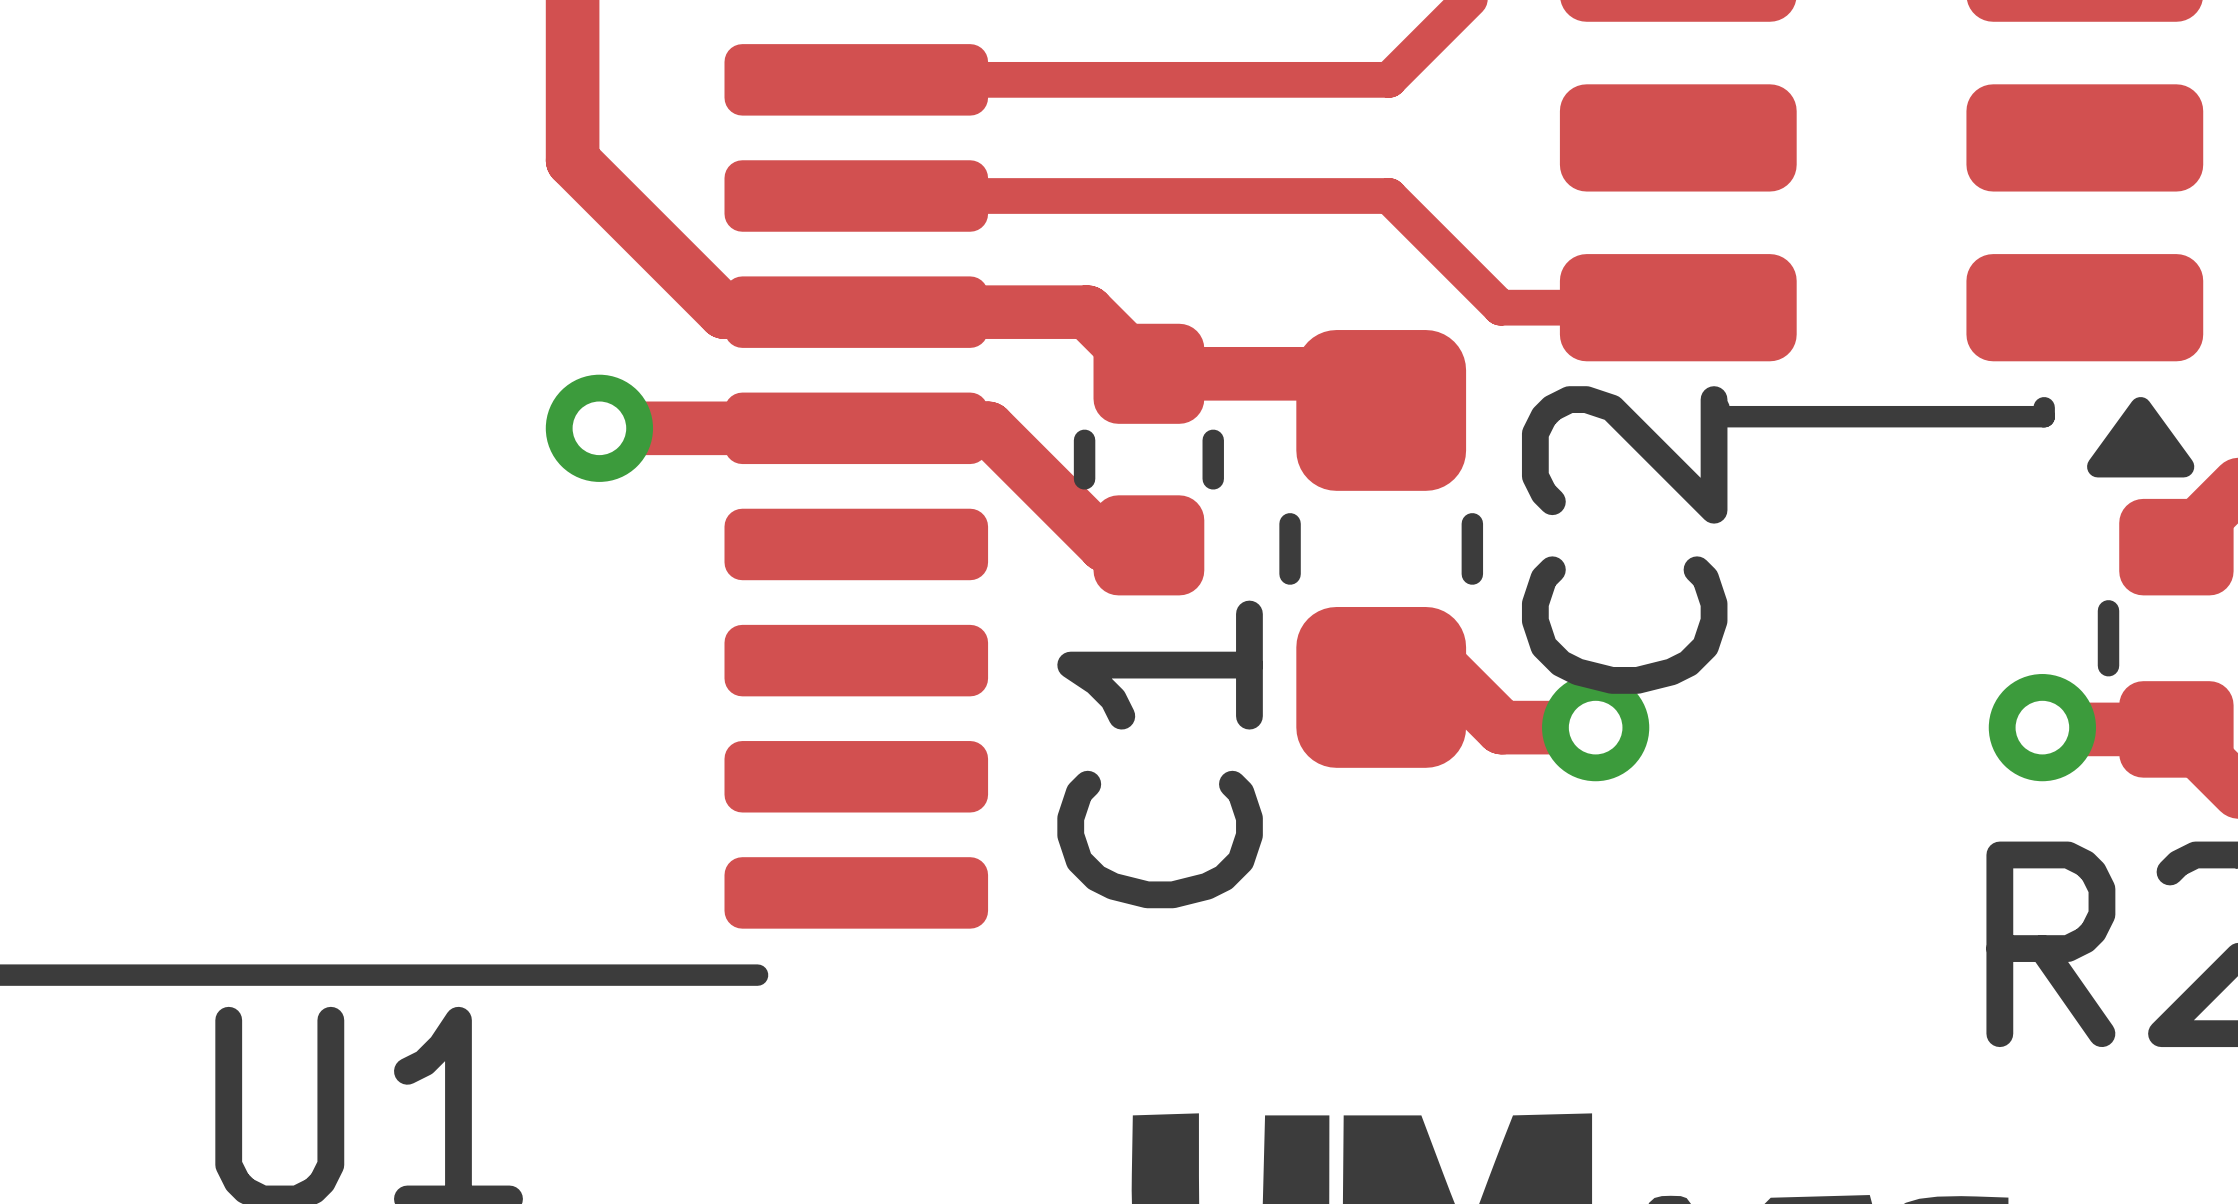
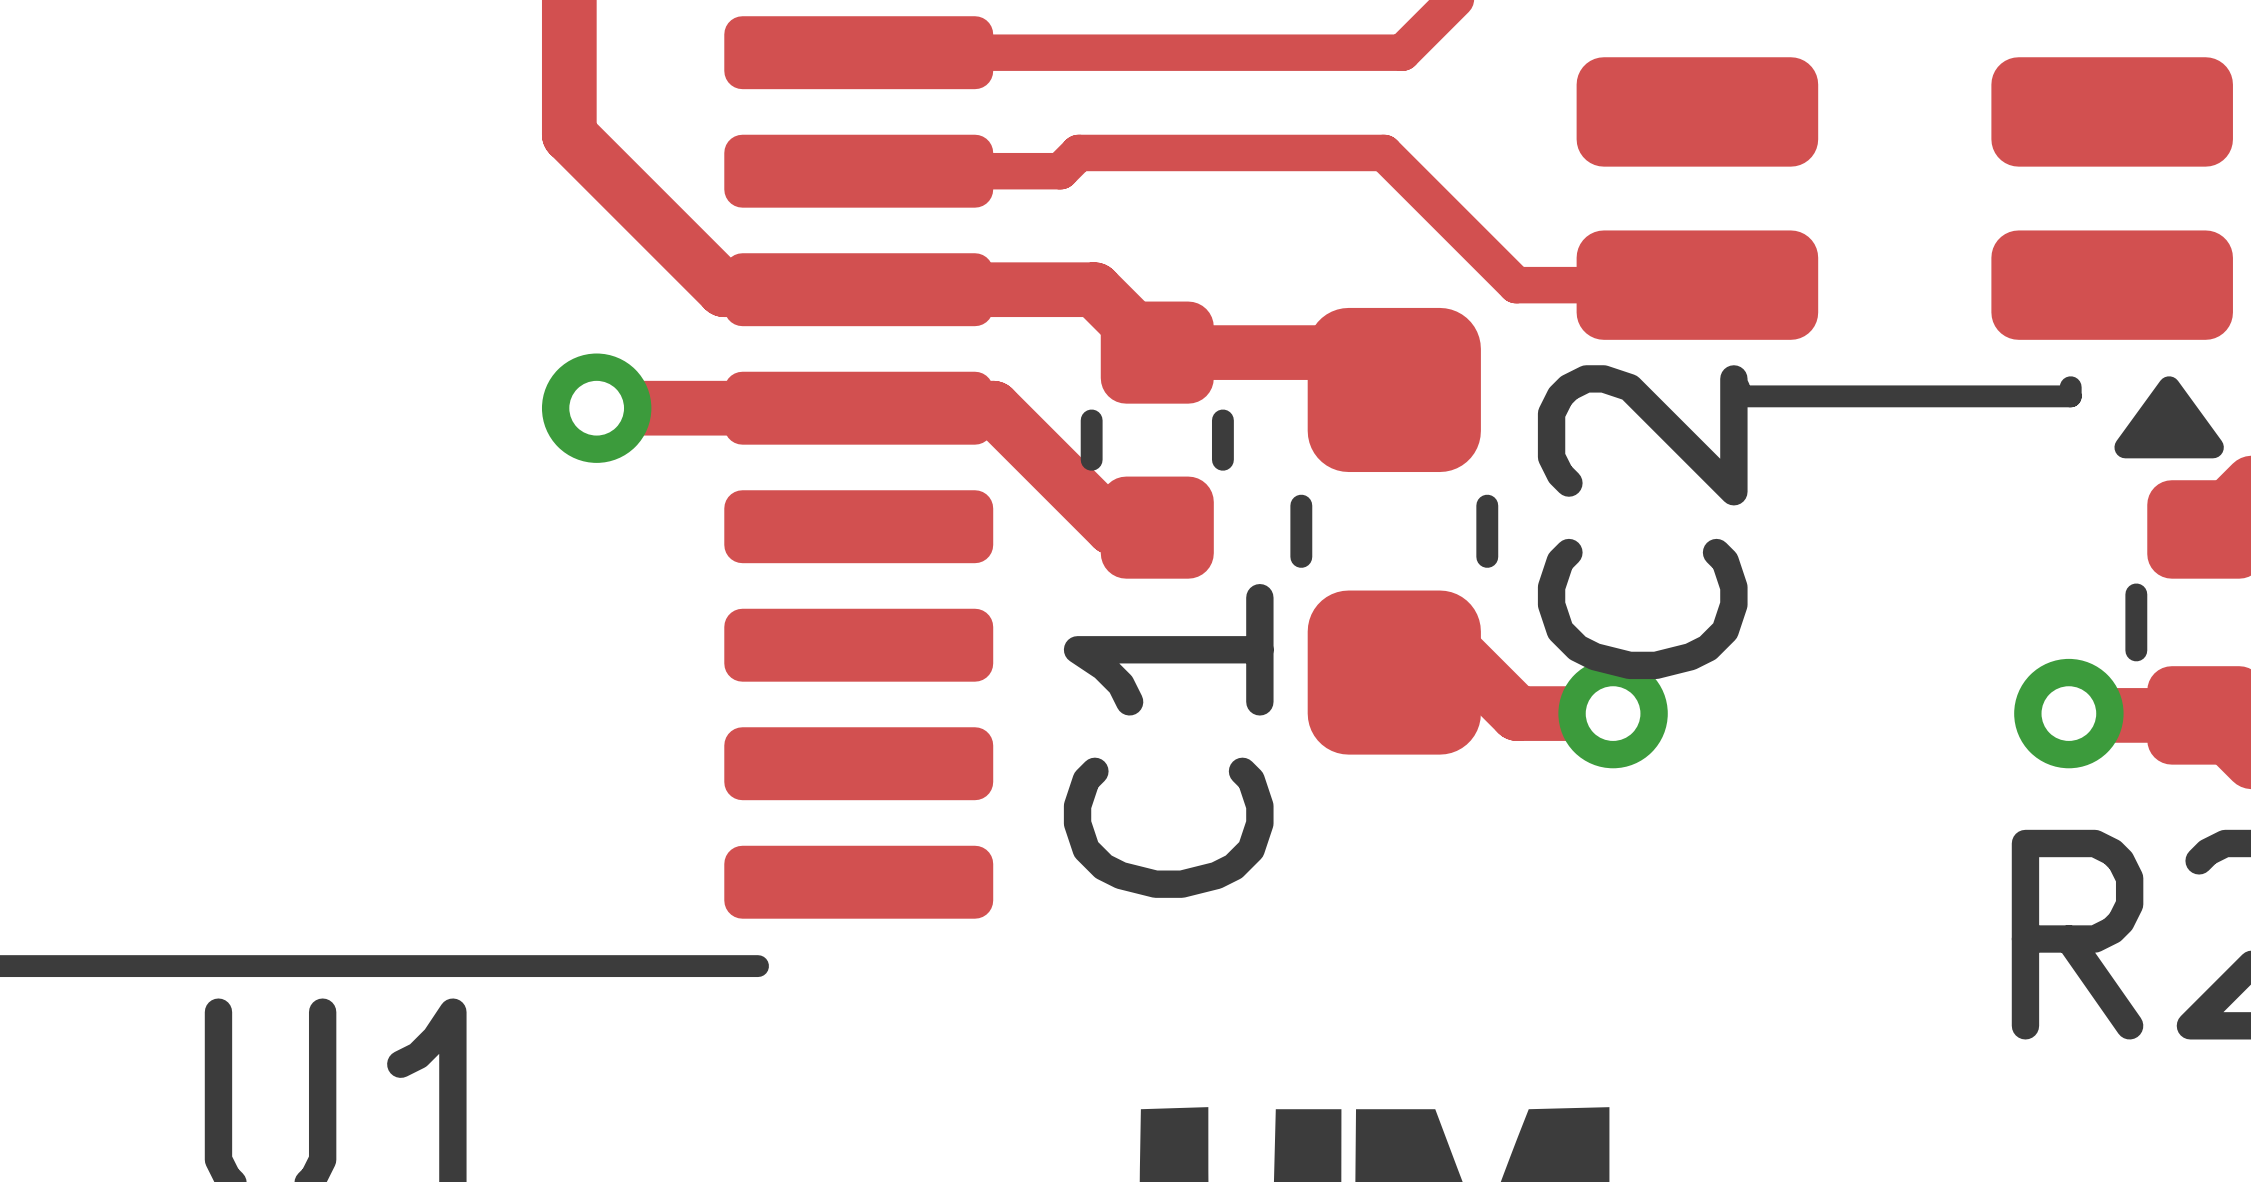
top track: (1053, 196) (1389, 196) -> (1060, 171) (1078, 152) (1384, 152) (1402, 171)

